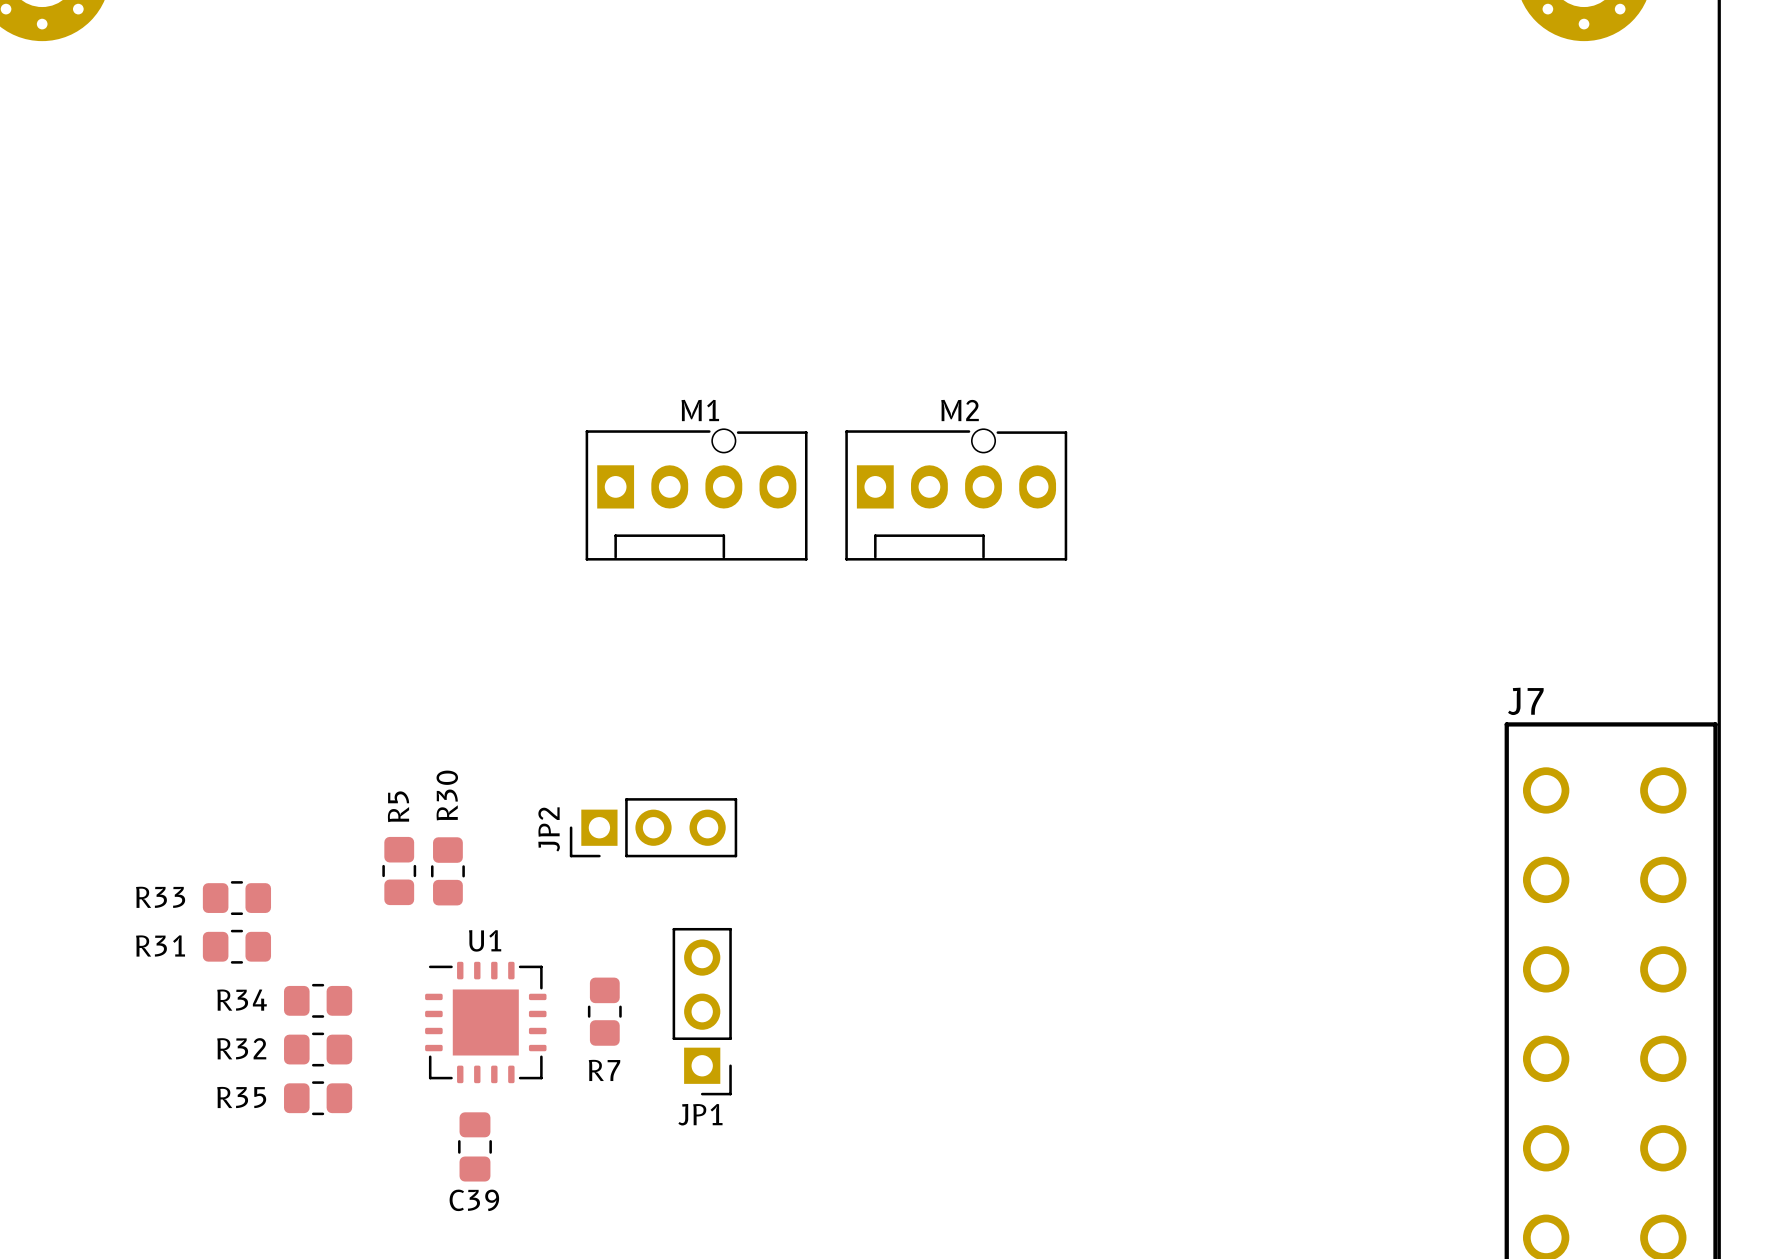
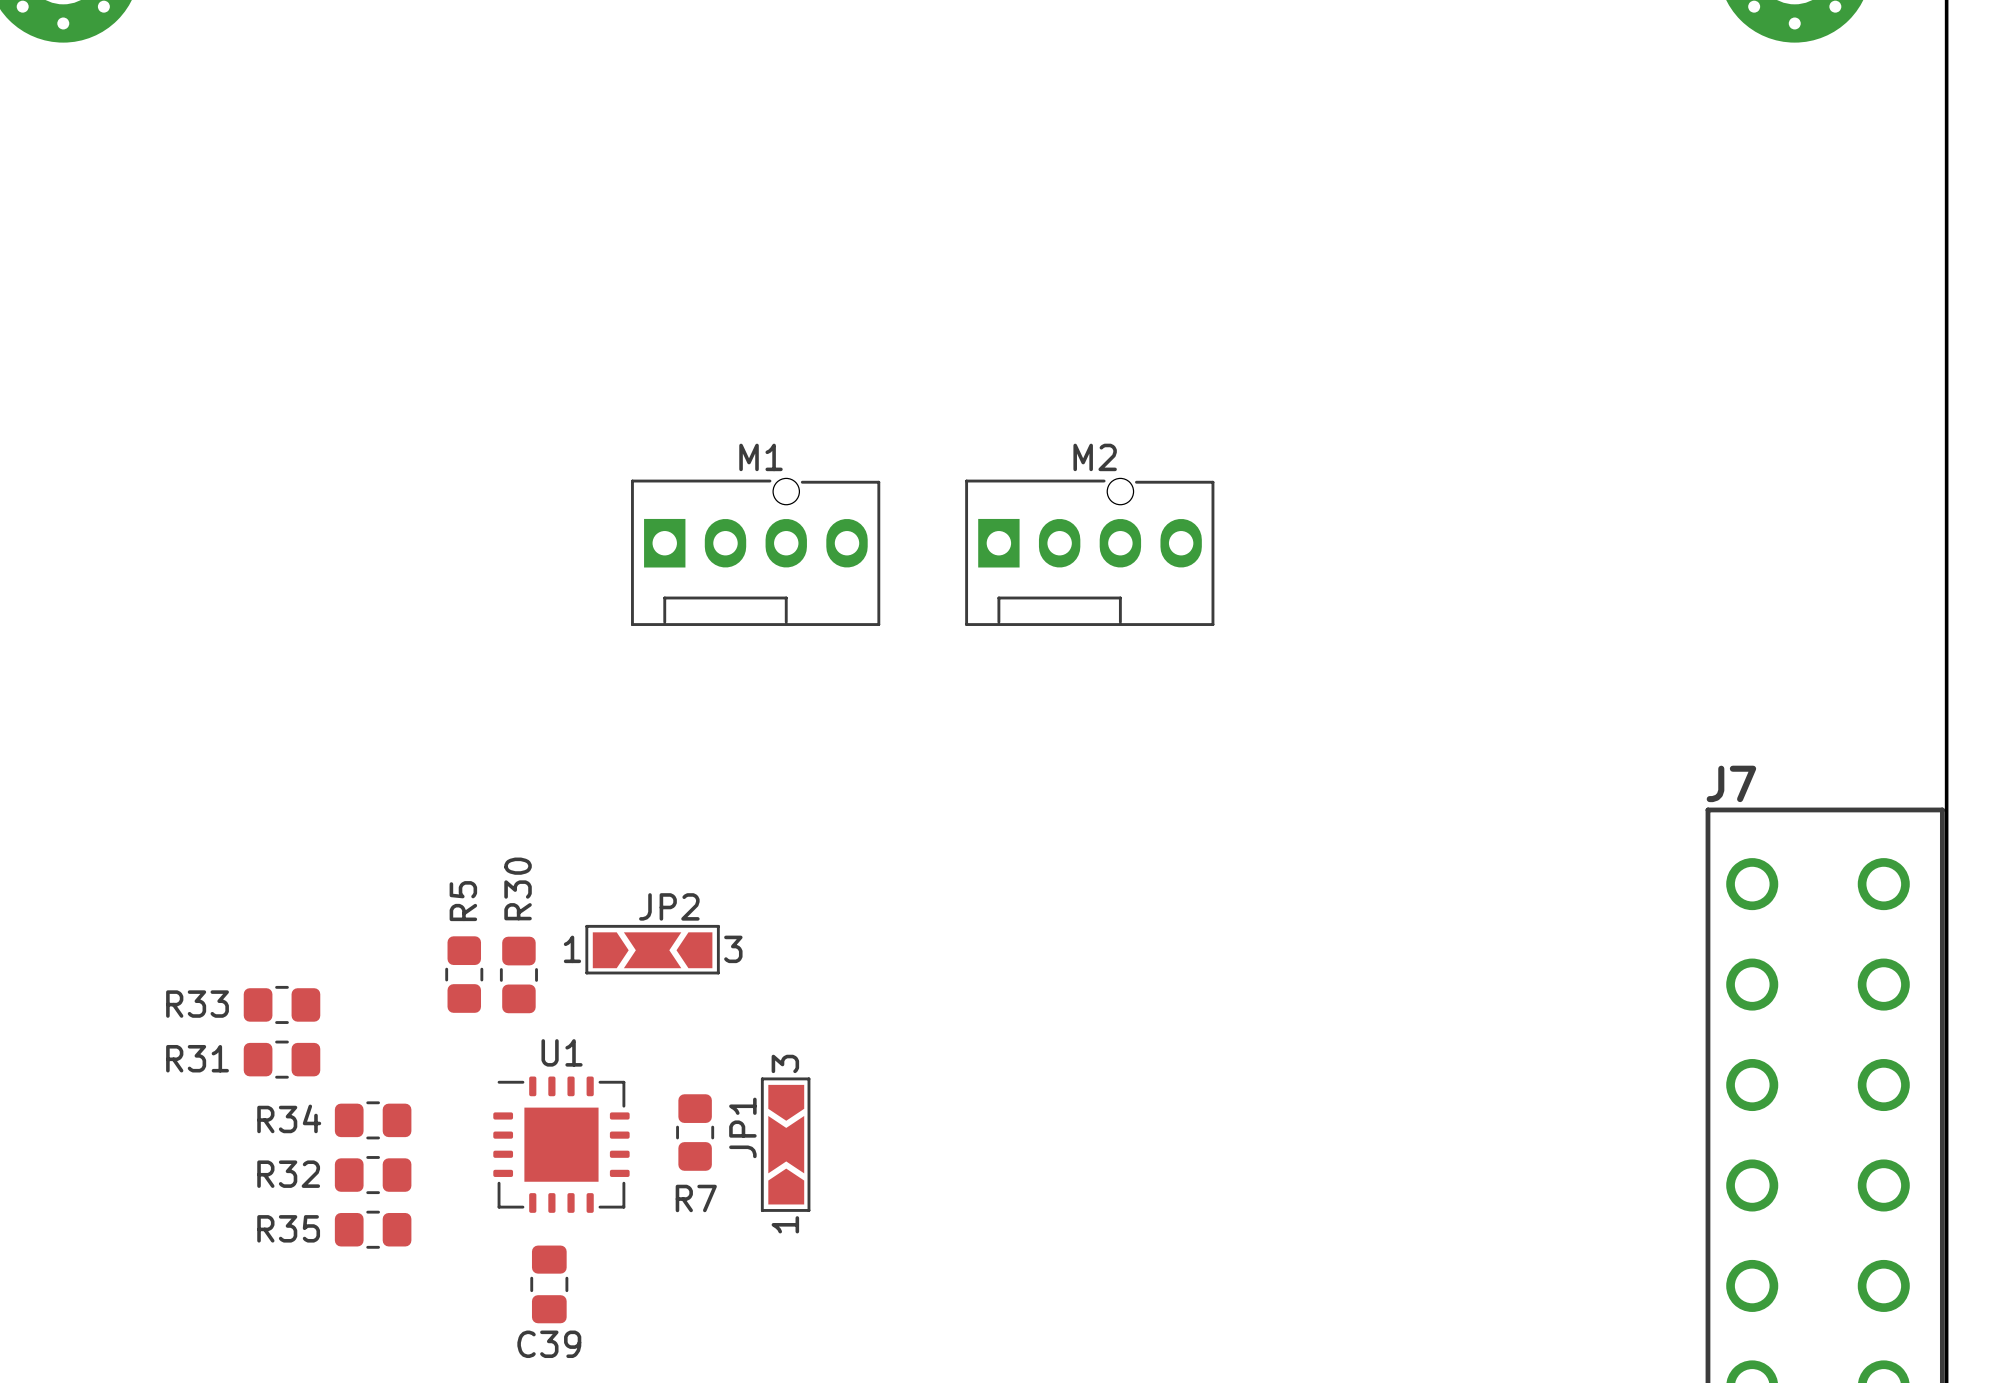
M1 position: (696, 494) -> (755, 552)
JP2 footprint: [569, 798, 738, 858] -> [585, 924, 720, 975]
JP2 name position: JP2 (549, 829) -> JP2 (669, 906)
JP1 footprint: [672, 927, 732, 1096] -> [760, 1077, 811, 1212]
JP1 name position: JP1 (700, 1114) -> JP1 (742, 1127)

